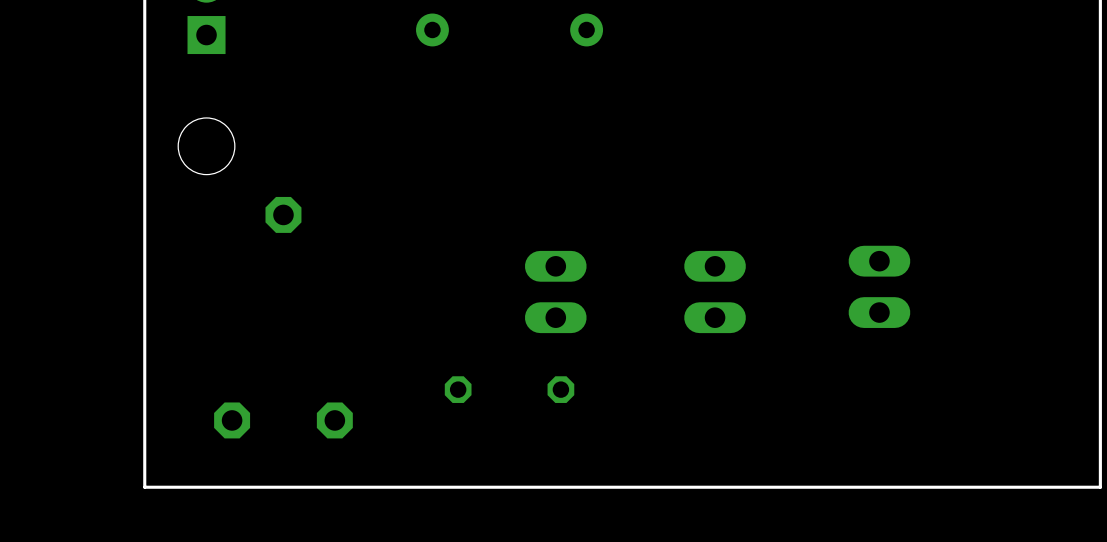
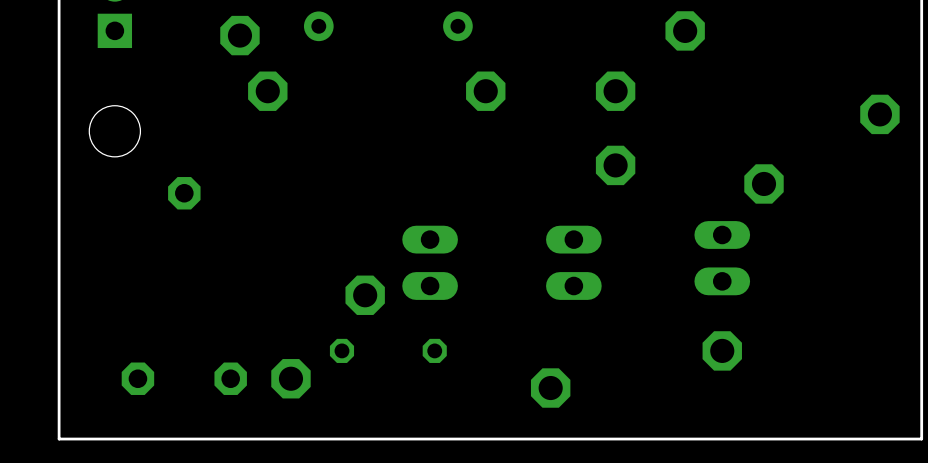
part: none -> (685, 30)
part: none -> (239, 35)
part: none -> (267, 91)
part: none -> (485, 91)
part: none -> (615, 91)
part: none -> (879, 114)
part: none -> (615, 165)
part: none -> (764, 183)
part: none -> (365, 295)
part: none -> (722, 350)
part: none -> (290, 378)
part: none -> (550, 388)

